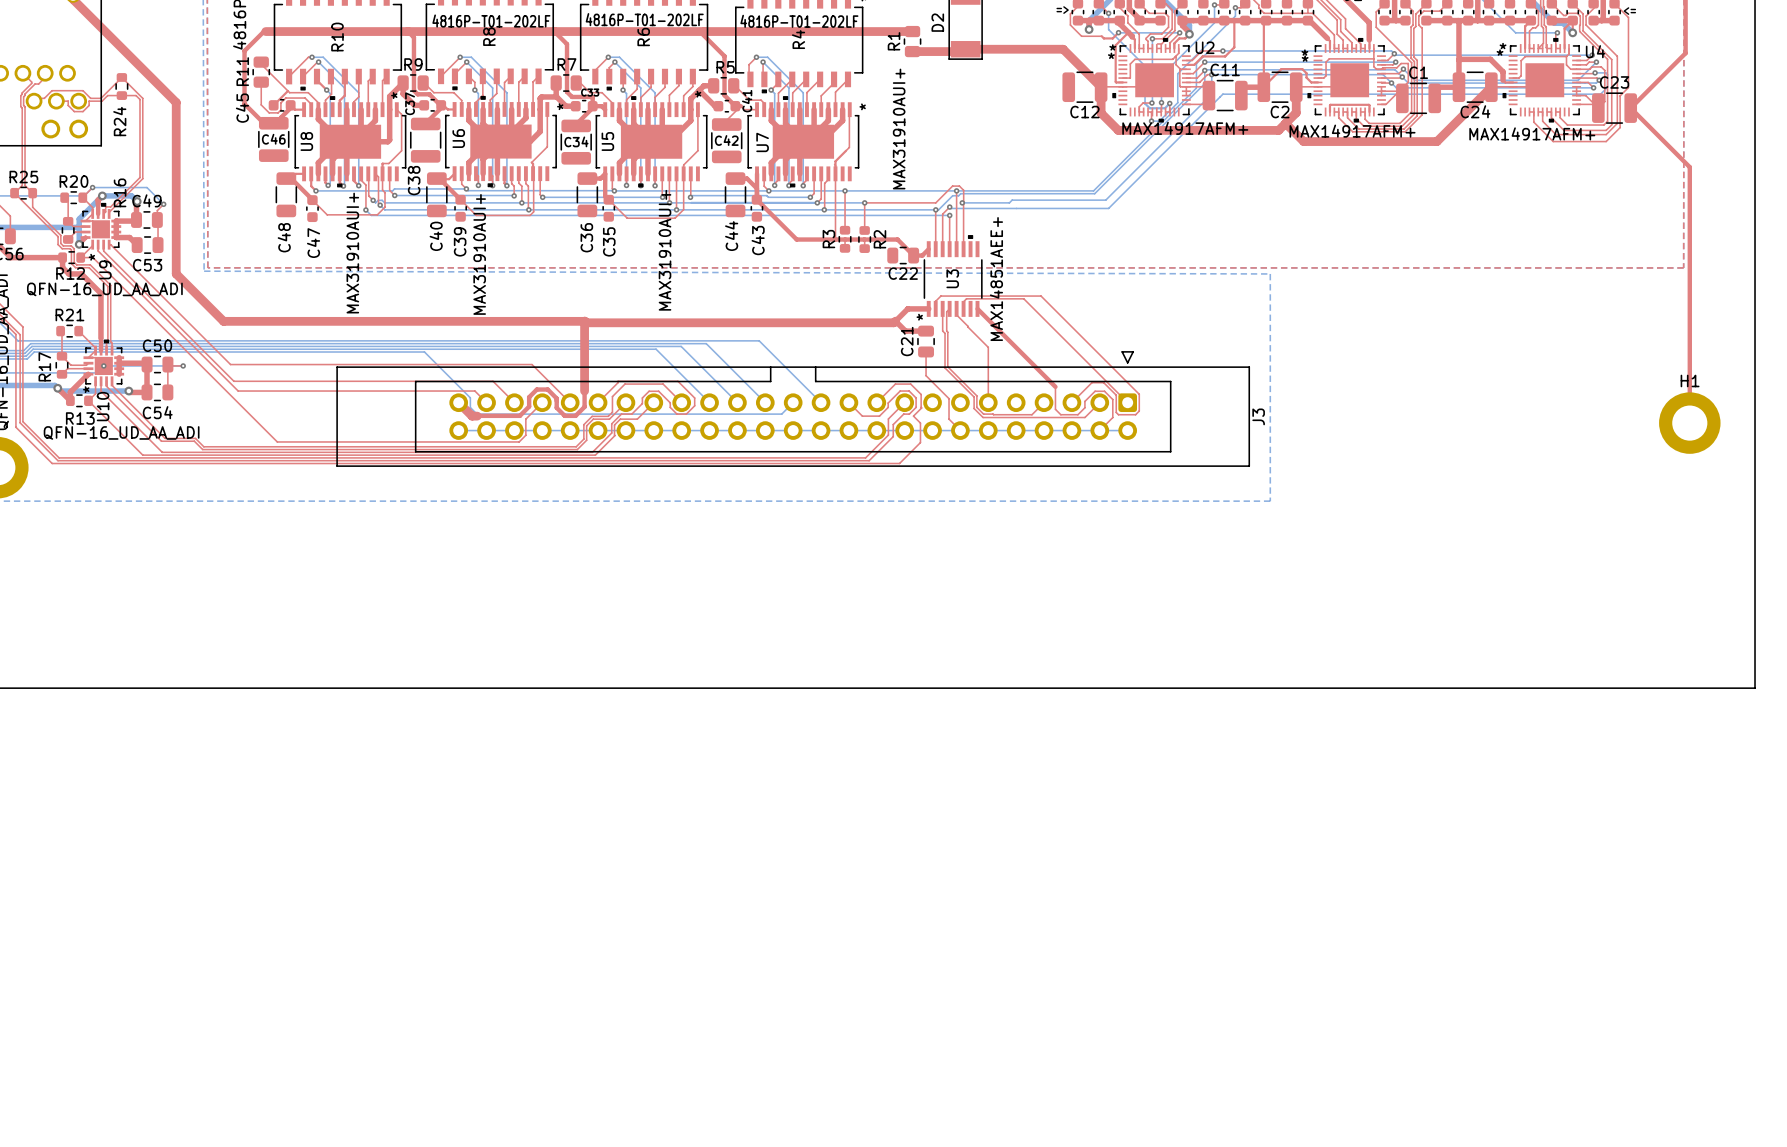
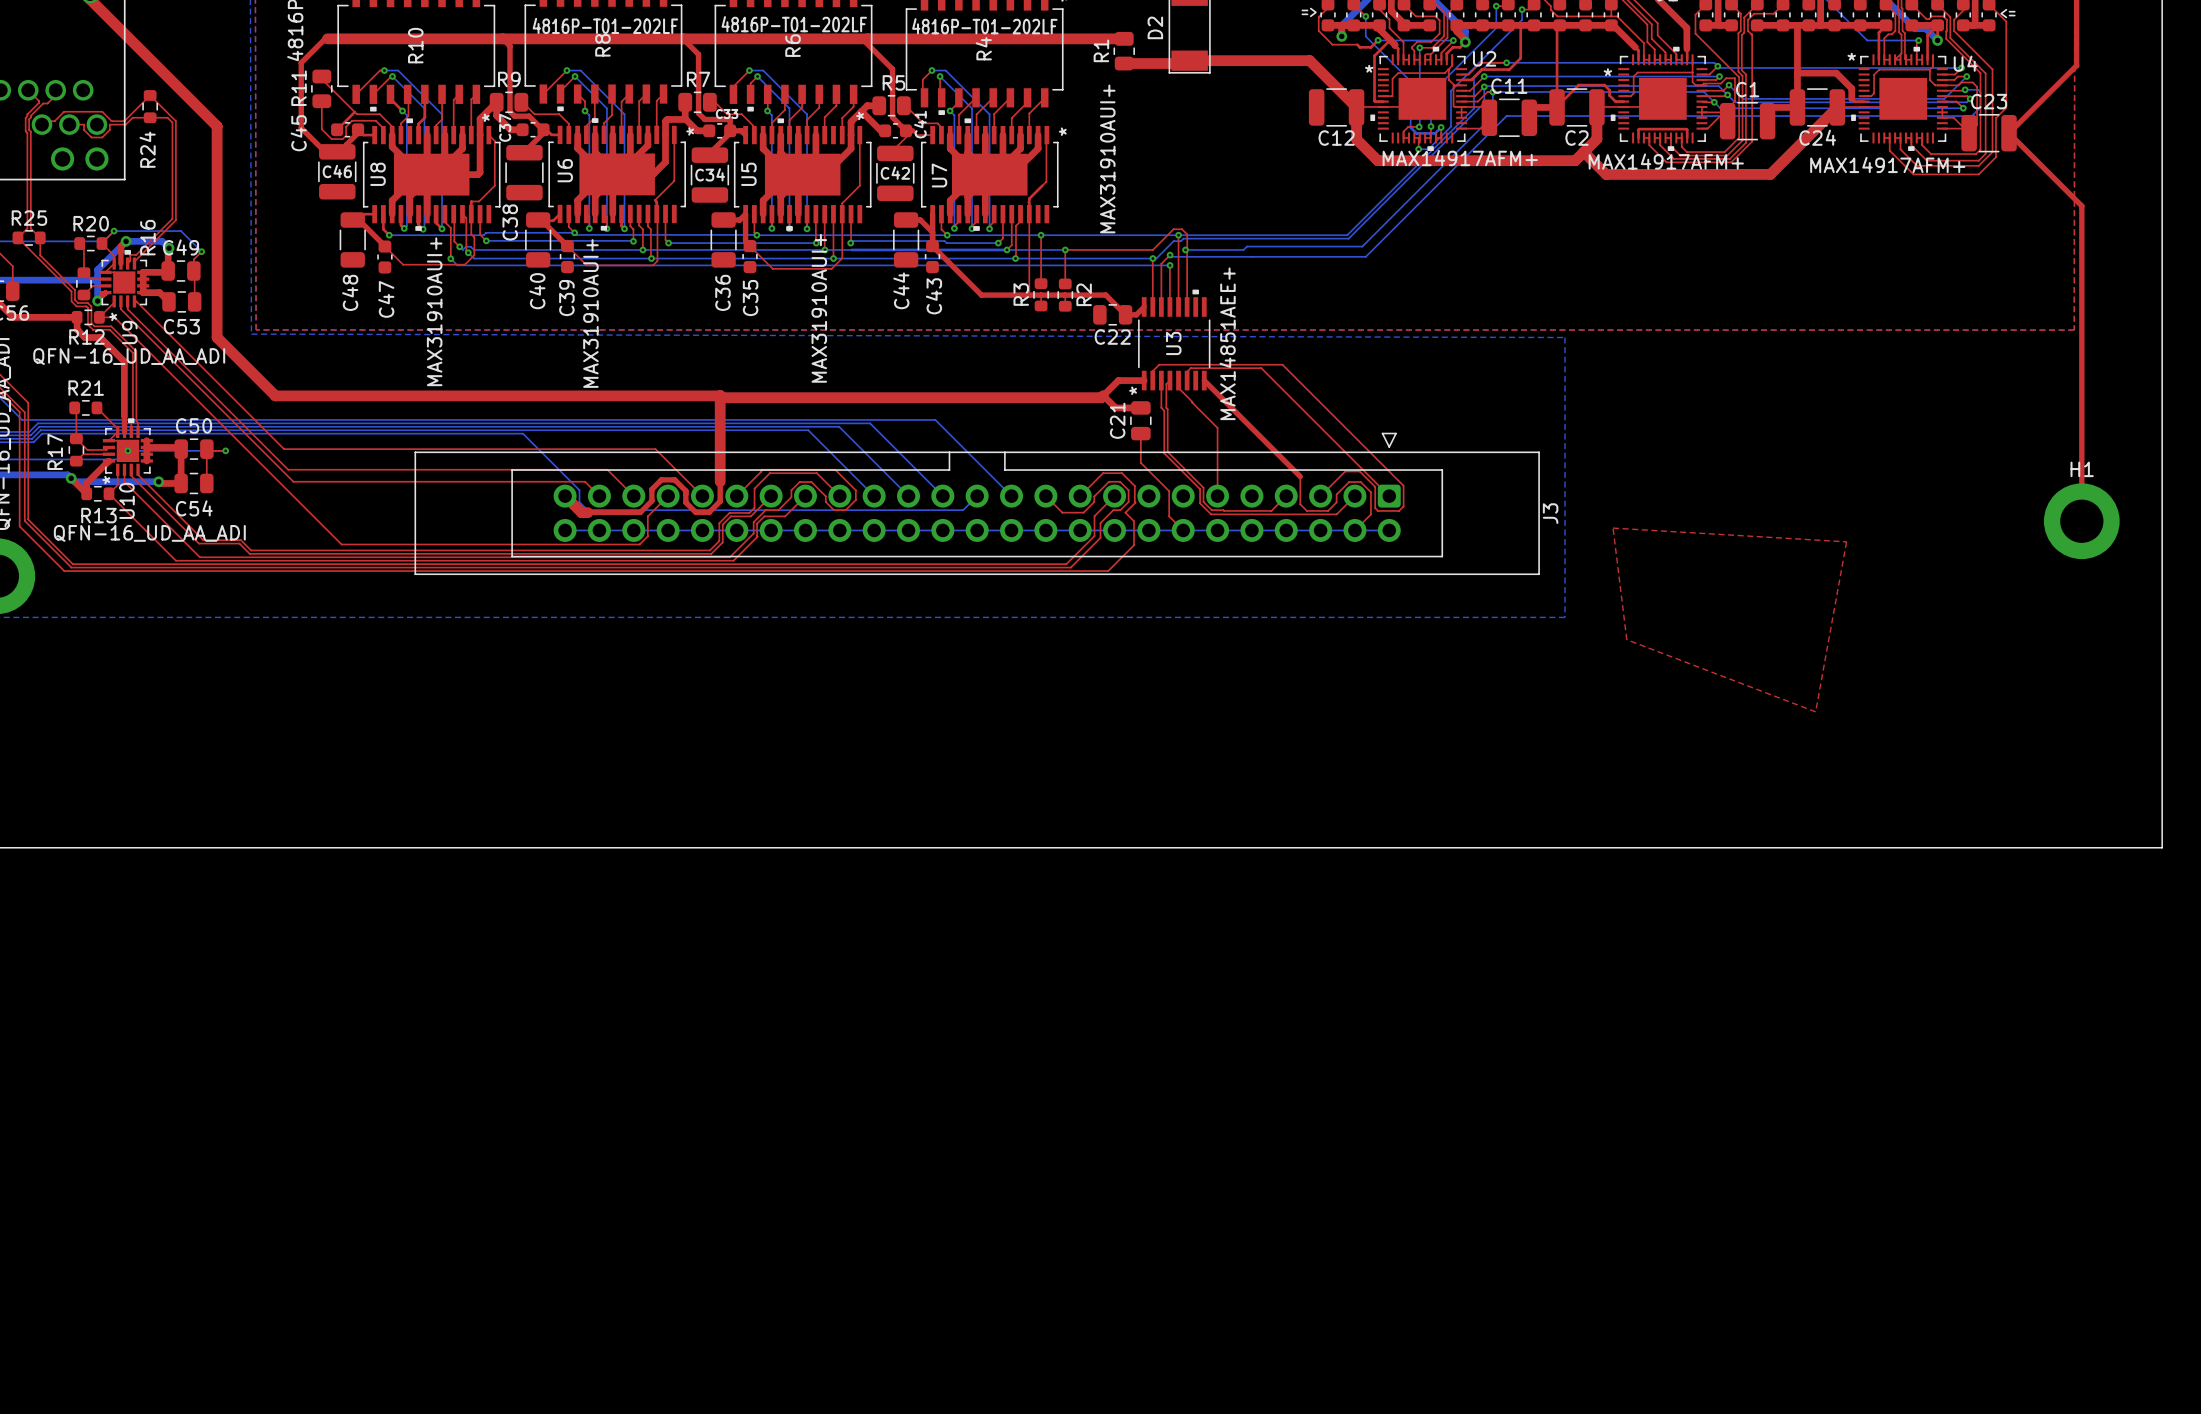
U2 text: * (1112, 47) -> none
part text: * (1304, 52) -> none
U4 text: * (1500, 52) -> none
top zone outline: none -> (1613, 528) (1626, 639) (1815, 711) (1846, 541) (1613, 528)

